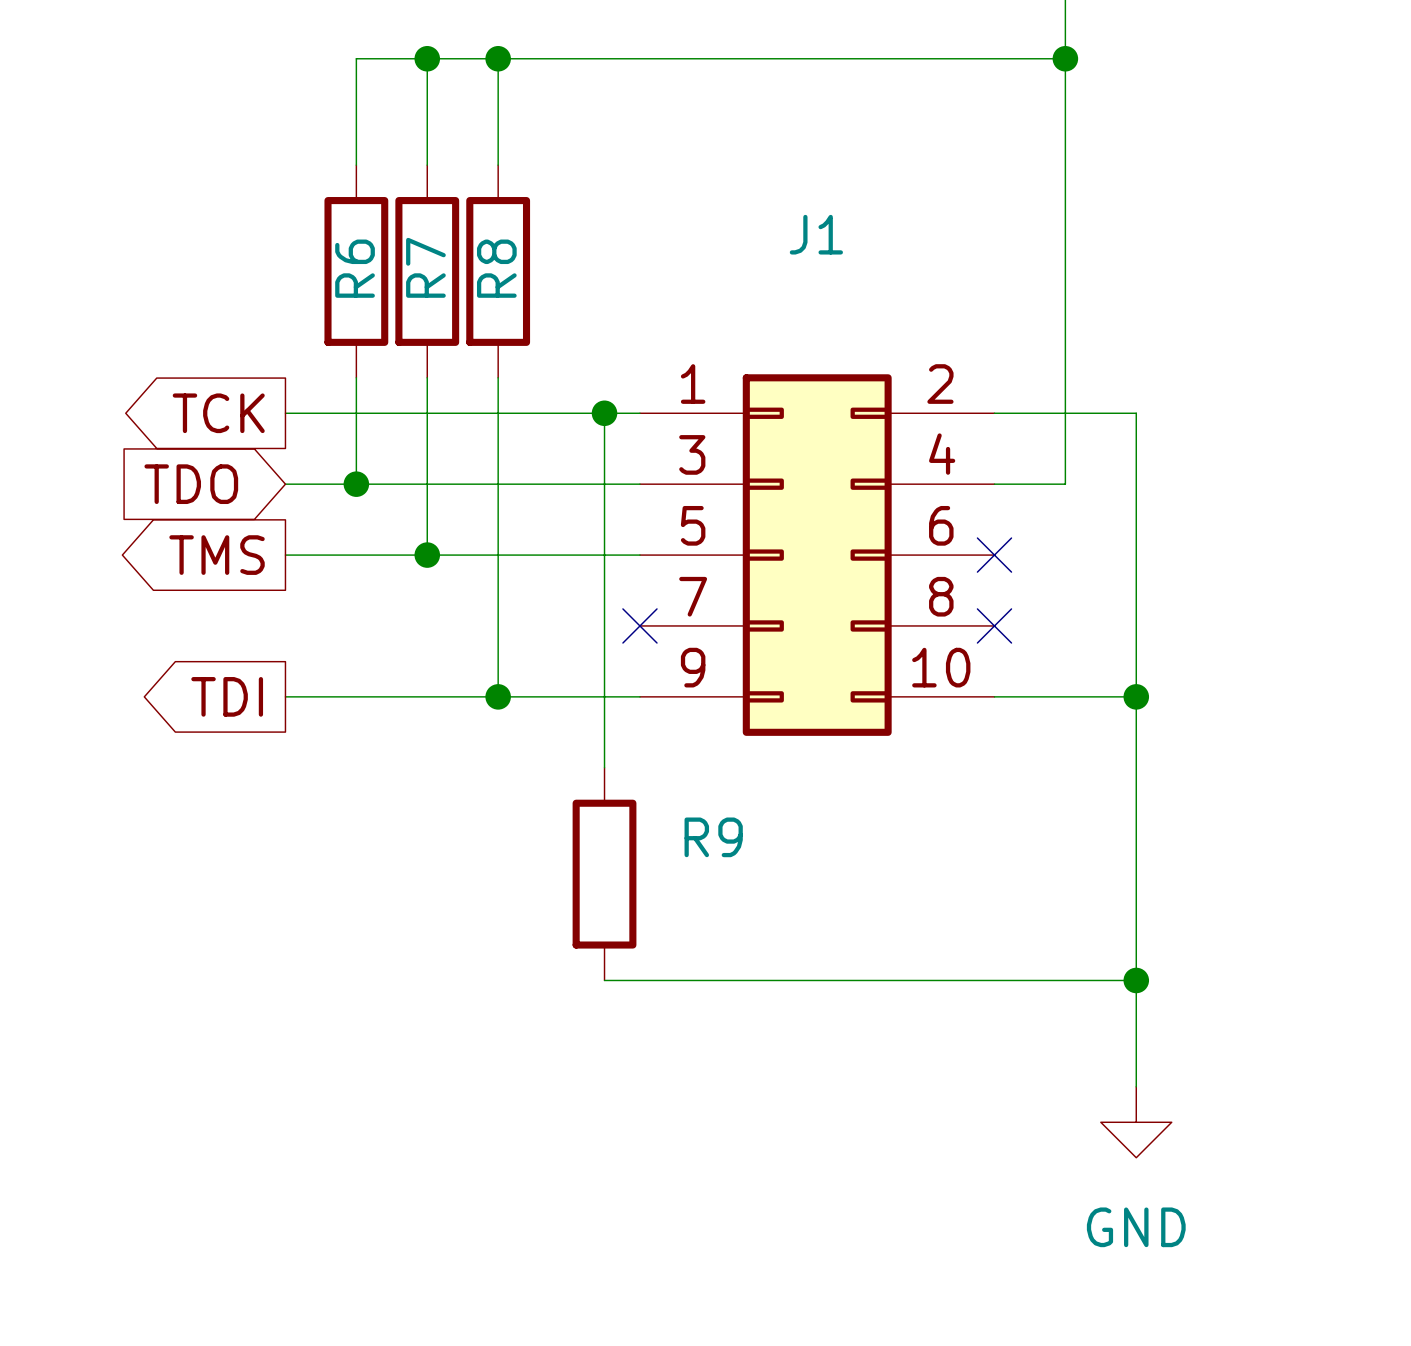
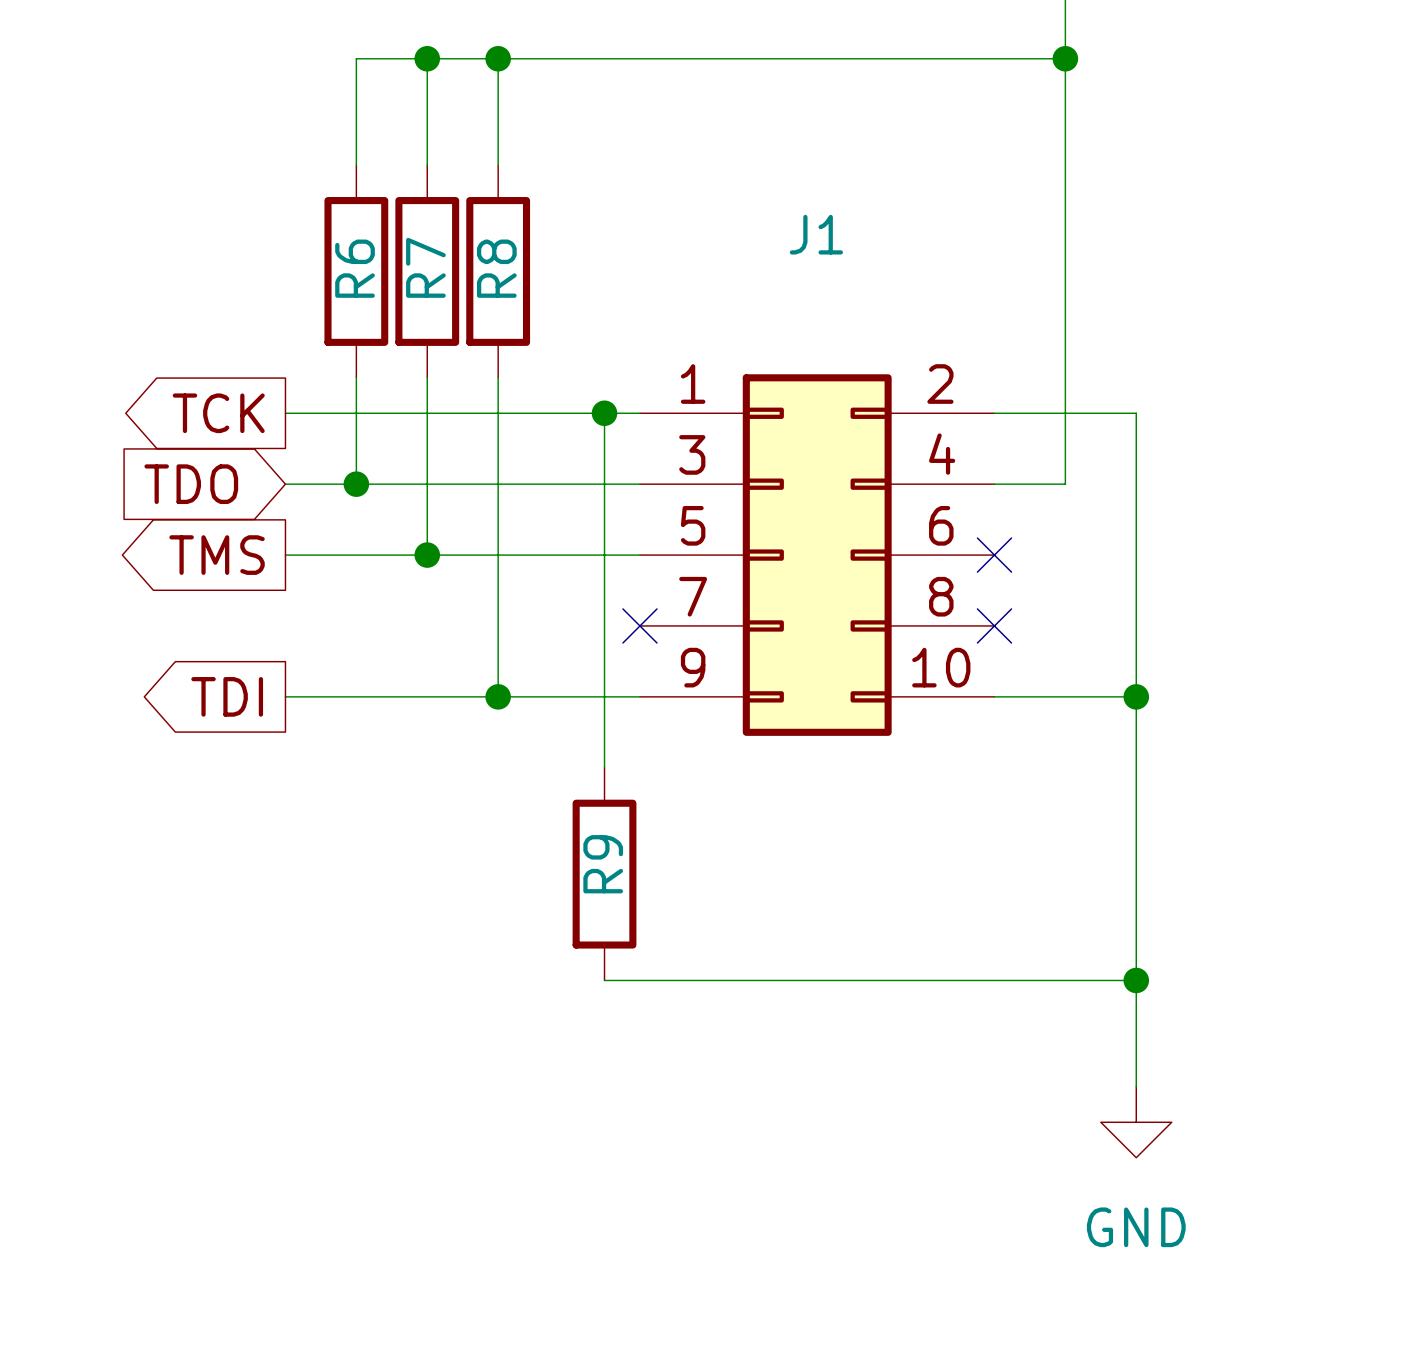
R9 name rotation: 0° (713, 837) -> 90° counterclockwise (603, 864)
R9 name position: R9 (713, 837) -> R9 (603, 864)

